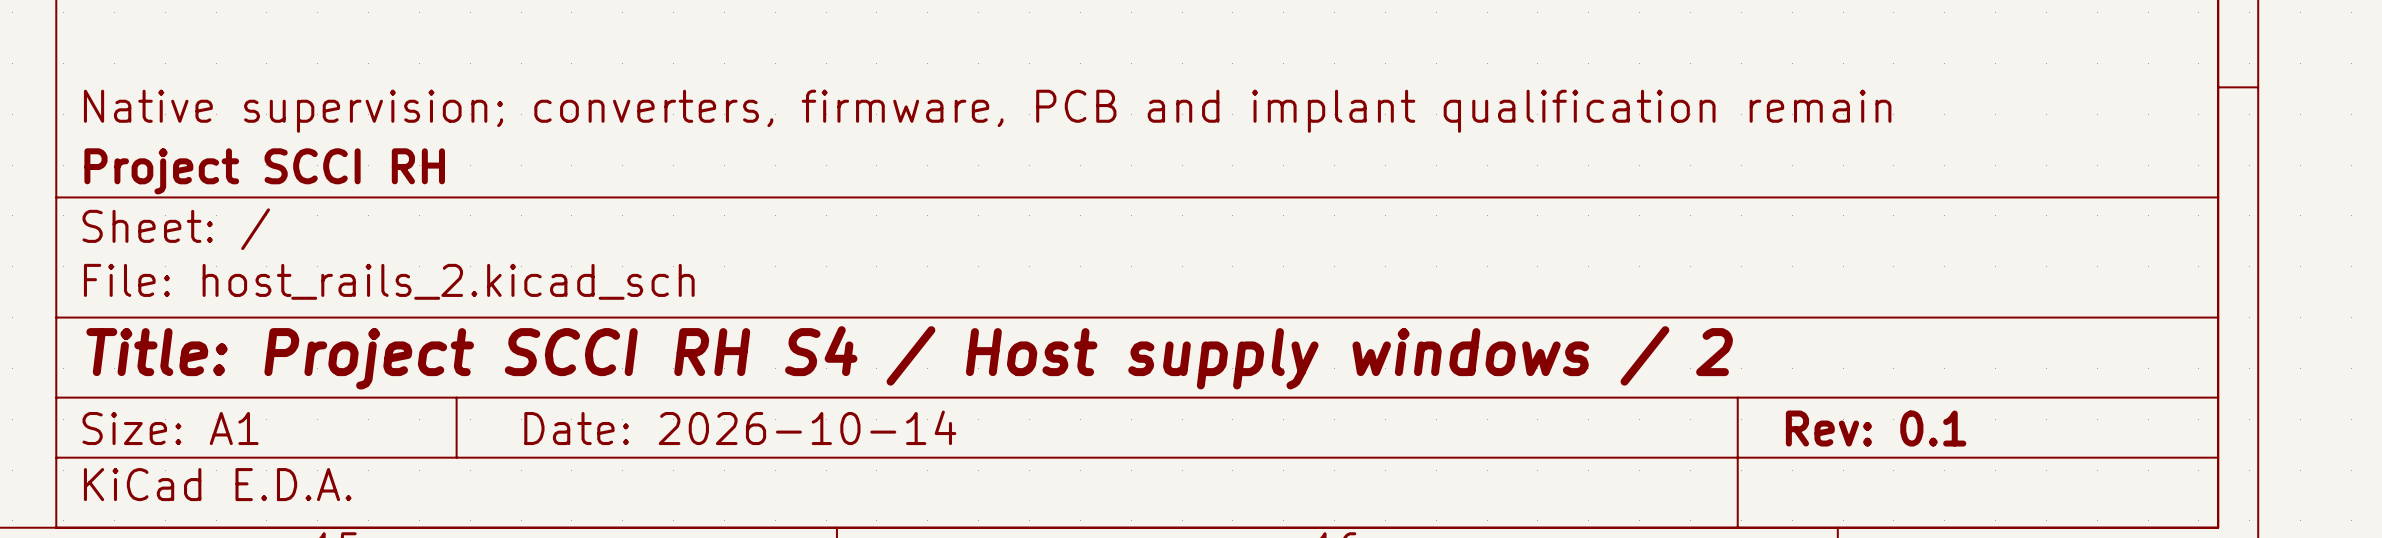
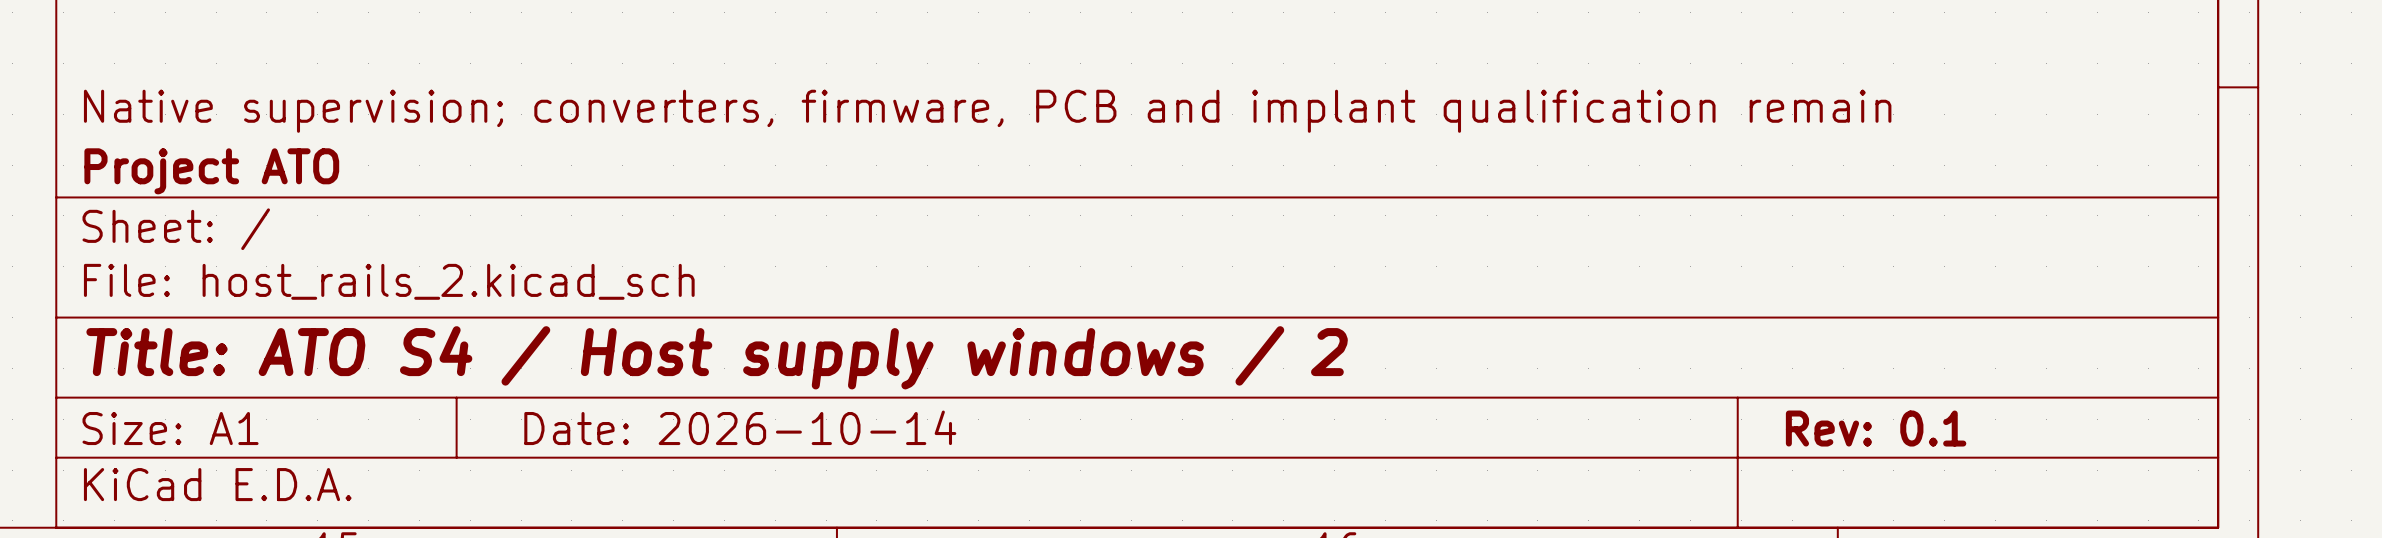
title block: Project SCCI RH (264, 171) -> Project ATO (211, 171)
title block: Title: Project SCCI RH S4 / Host supply windows / 2 (909, 357) -> Title: ATO S4 / Host supply windows / 2 (717, 357)

